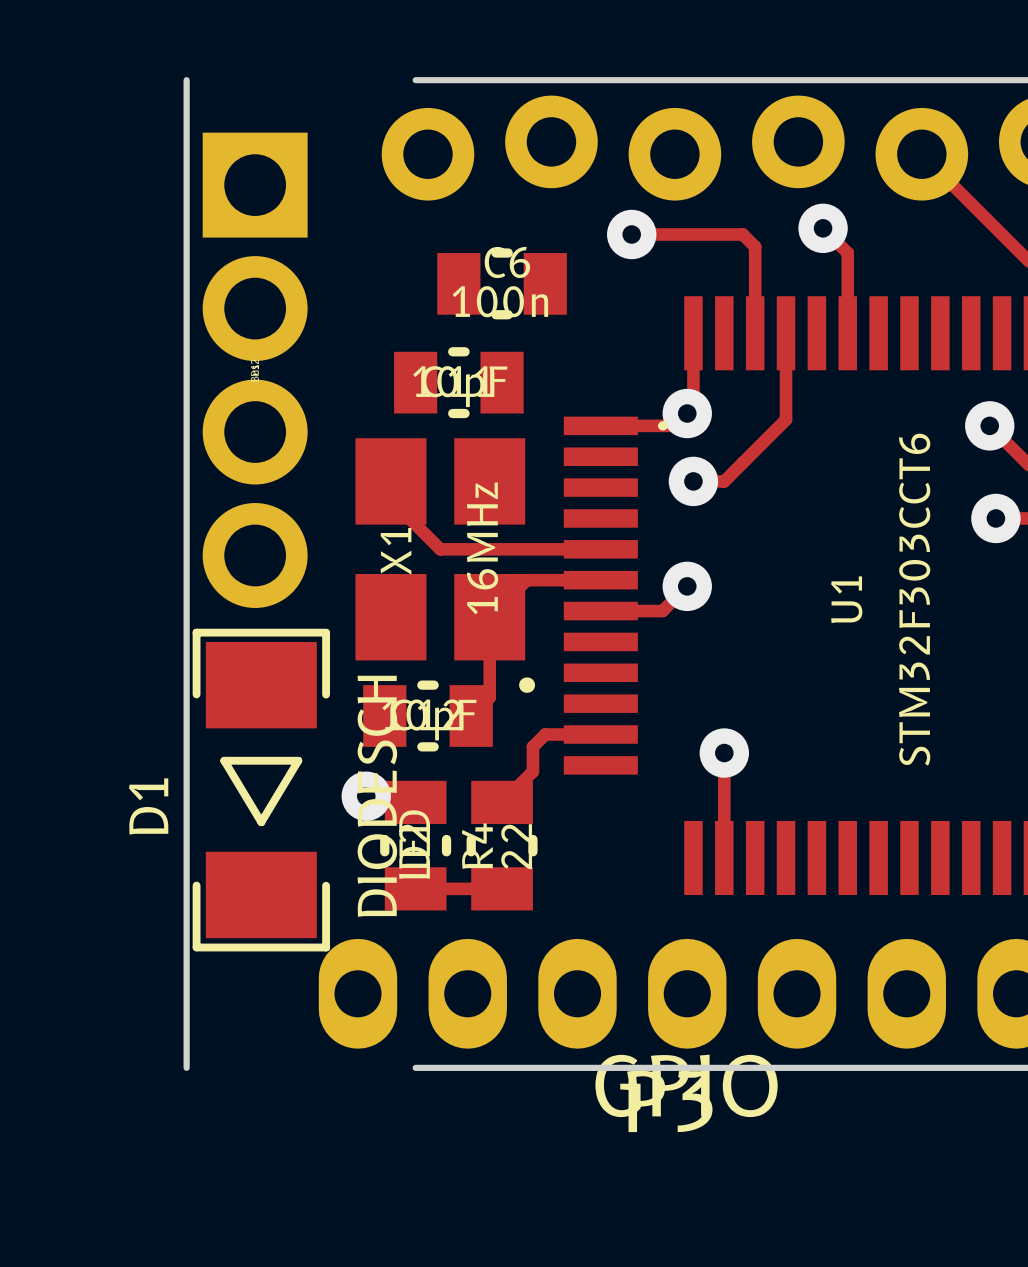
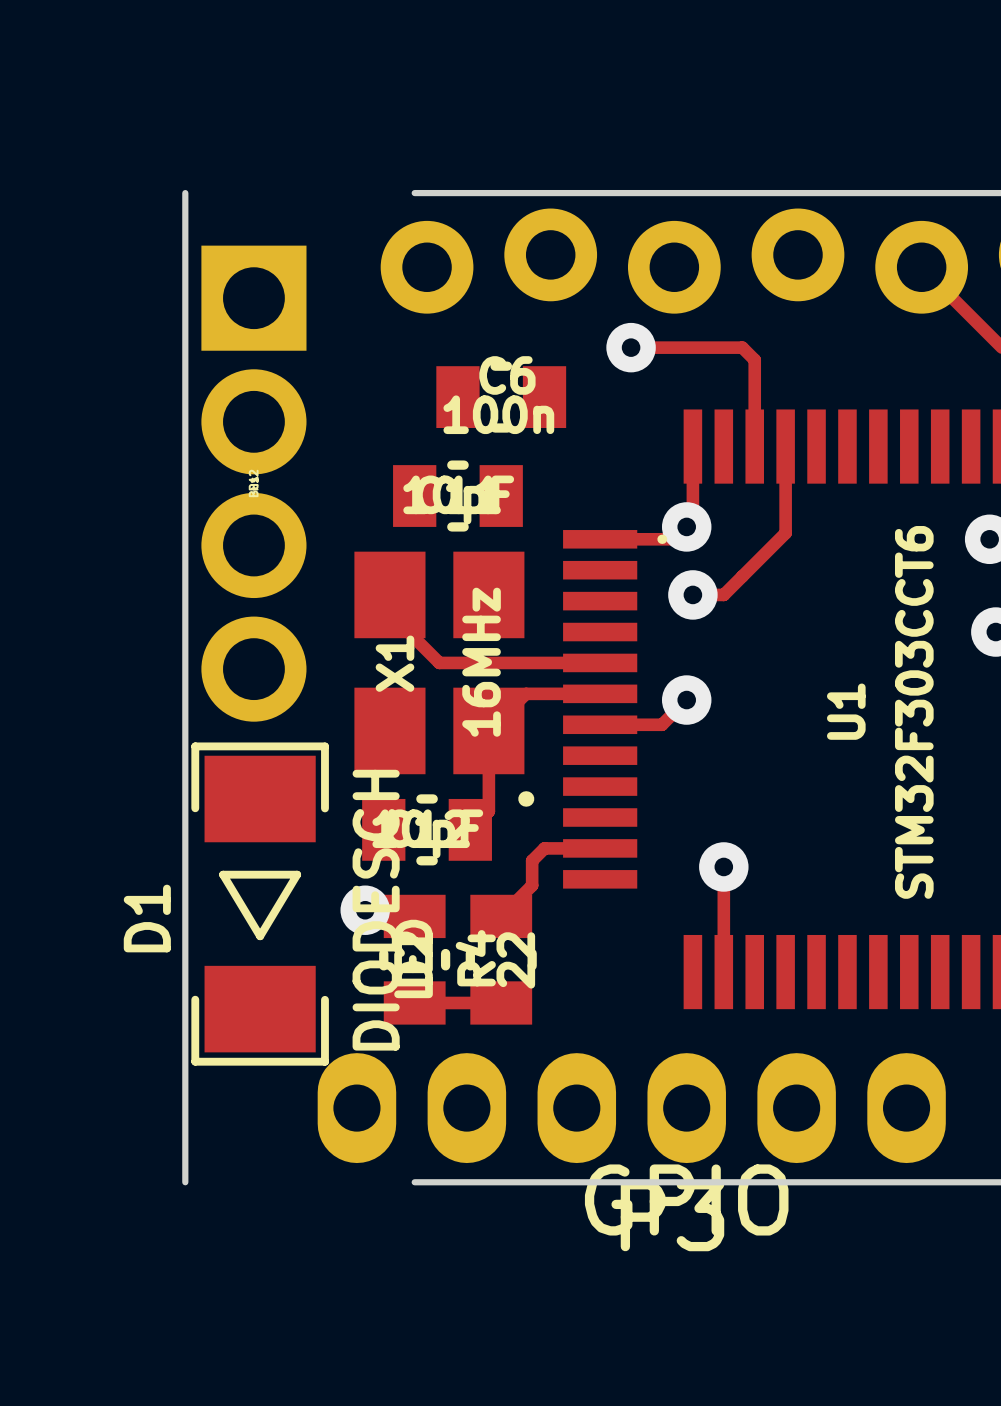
track: (823, 228) (847, 253) (847, 333) -> none
via: (823, 228) -> none

